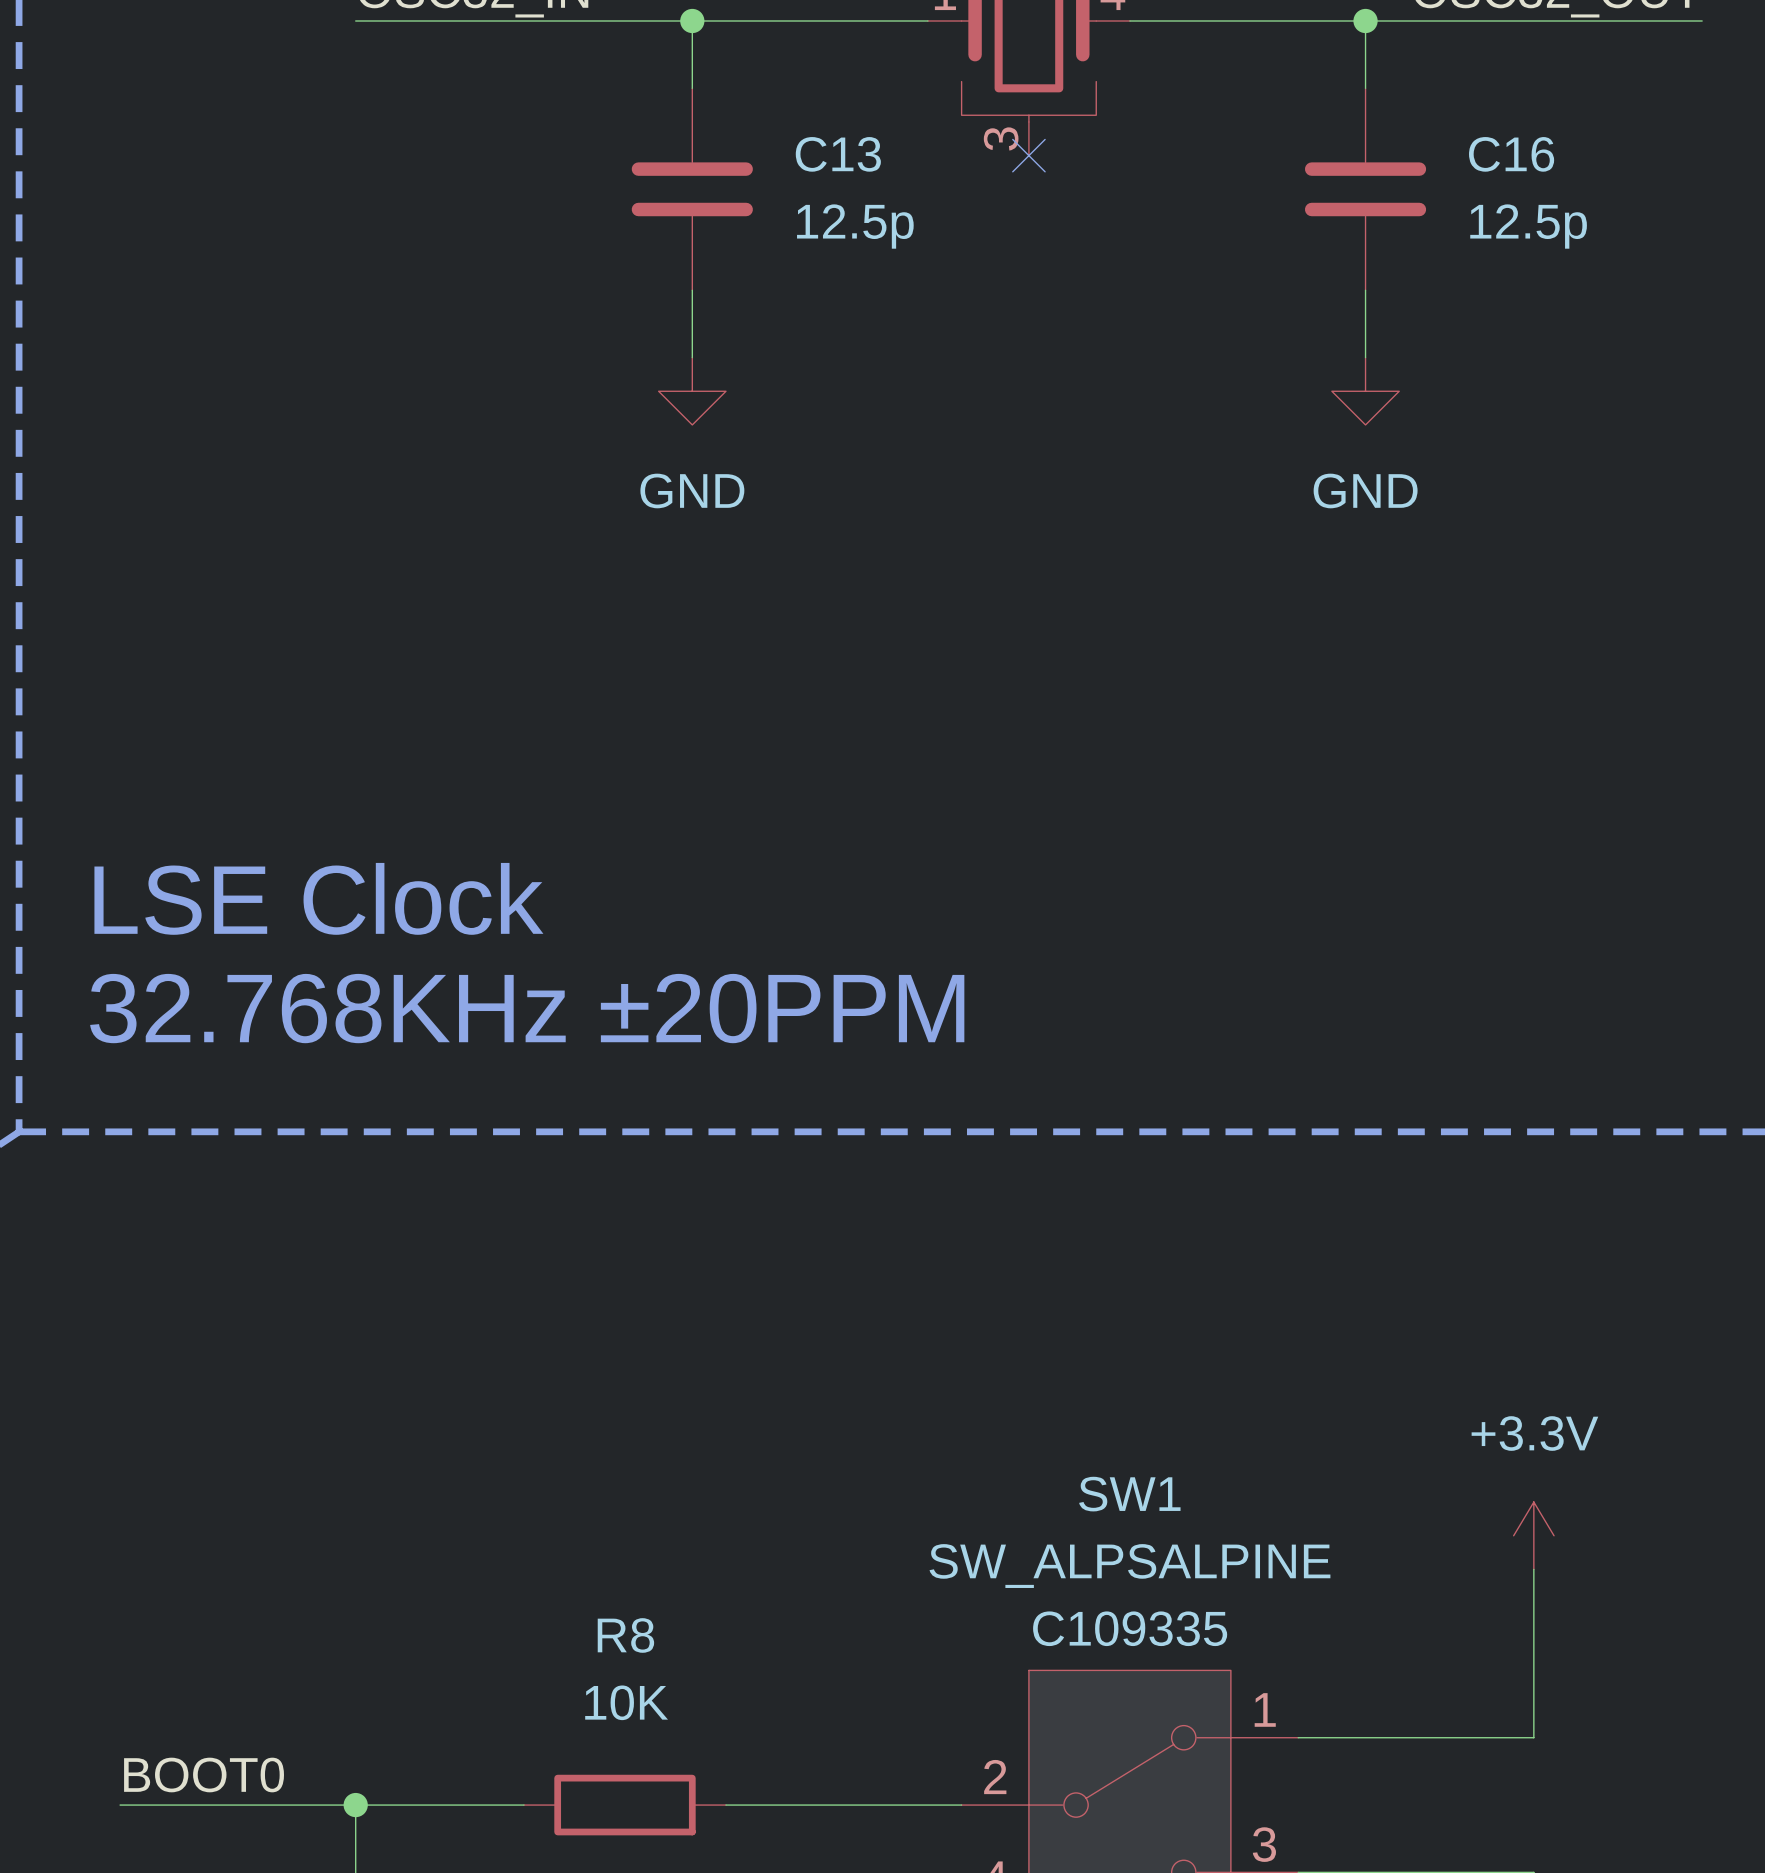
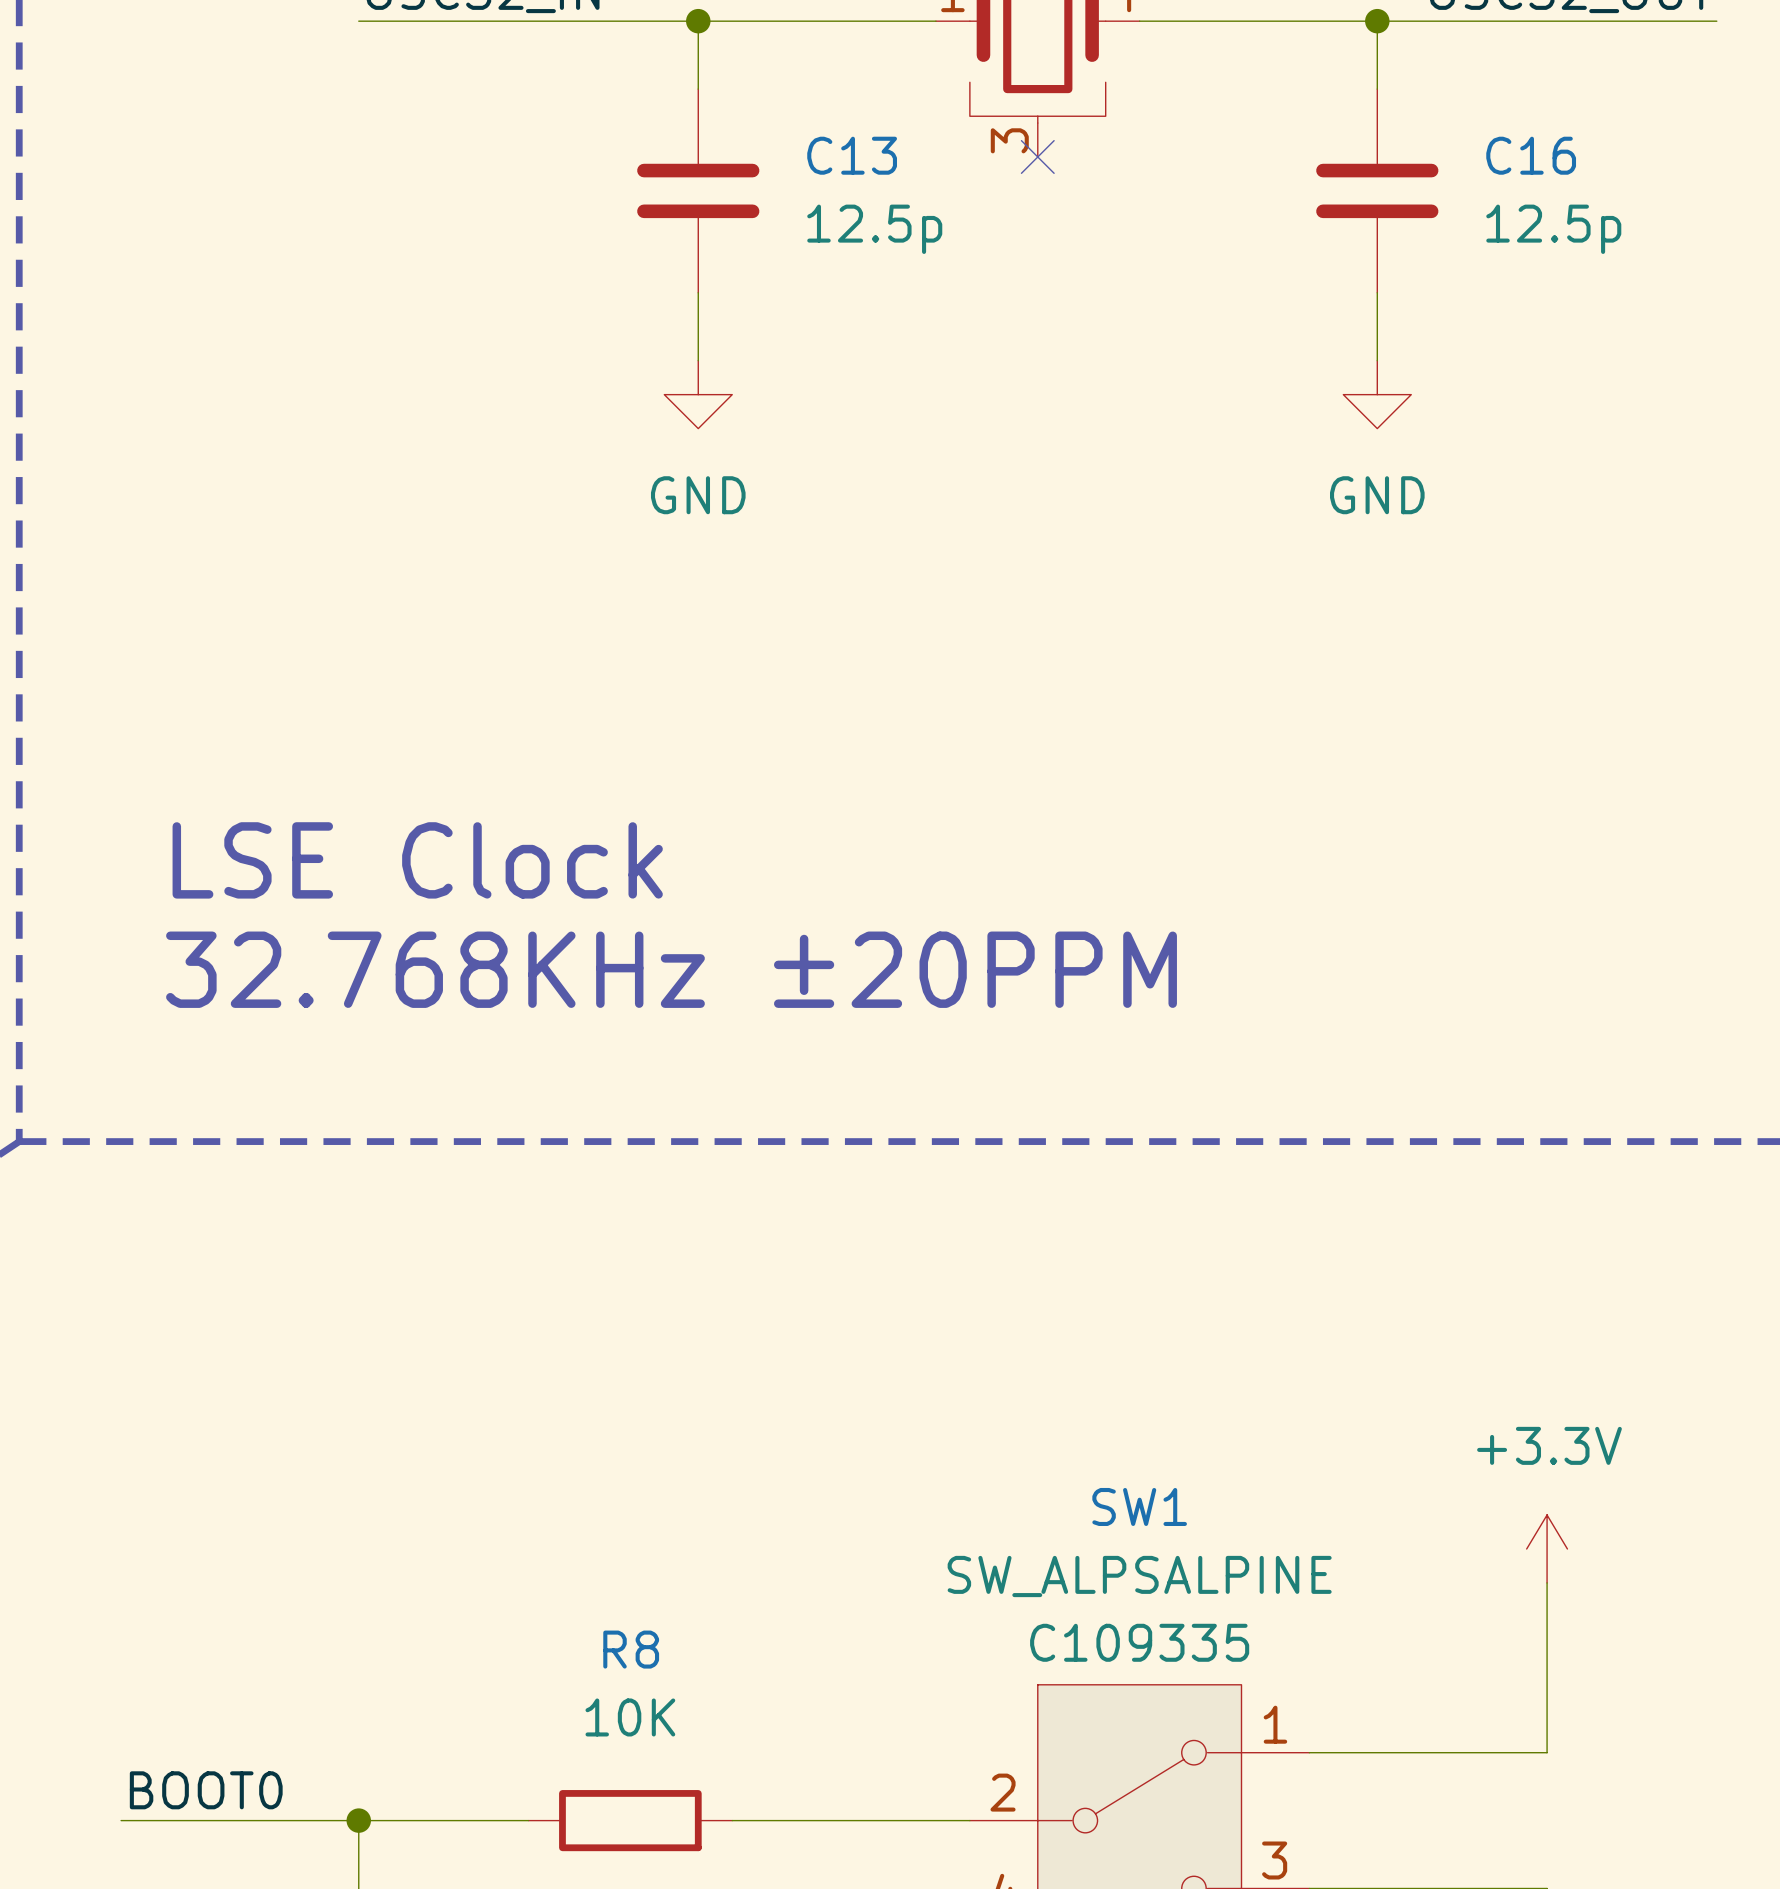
text position: LSE Clock (318, 898) -> LSE Clock (417, 860)
text position: 32.768KHz ±20PPM (527, 1008) -> 32.768KHz ±20PPM (671, 969)

